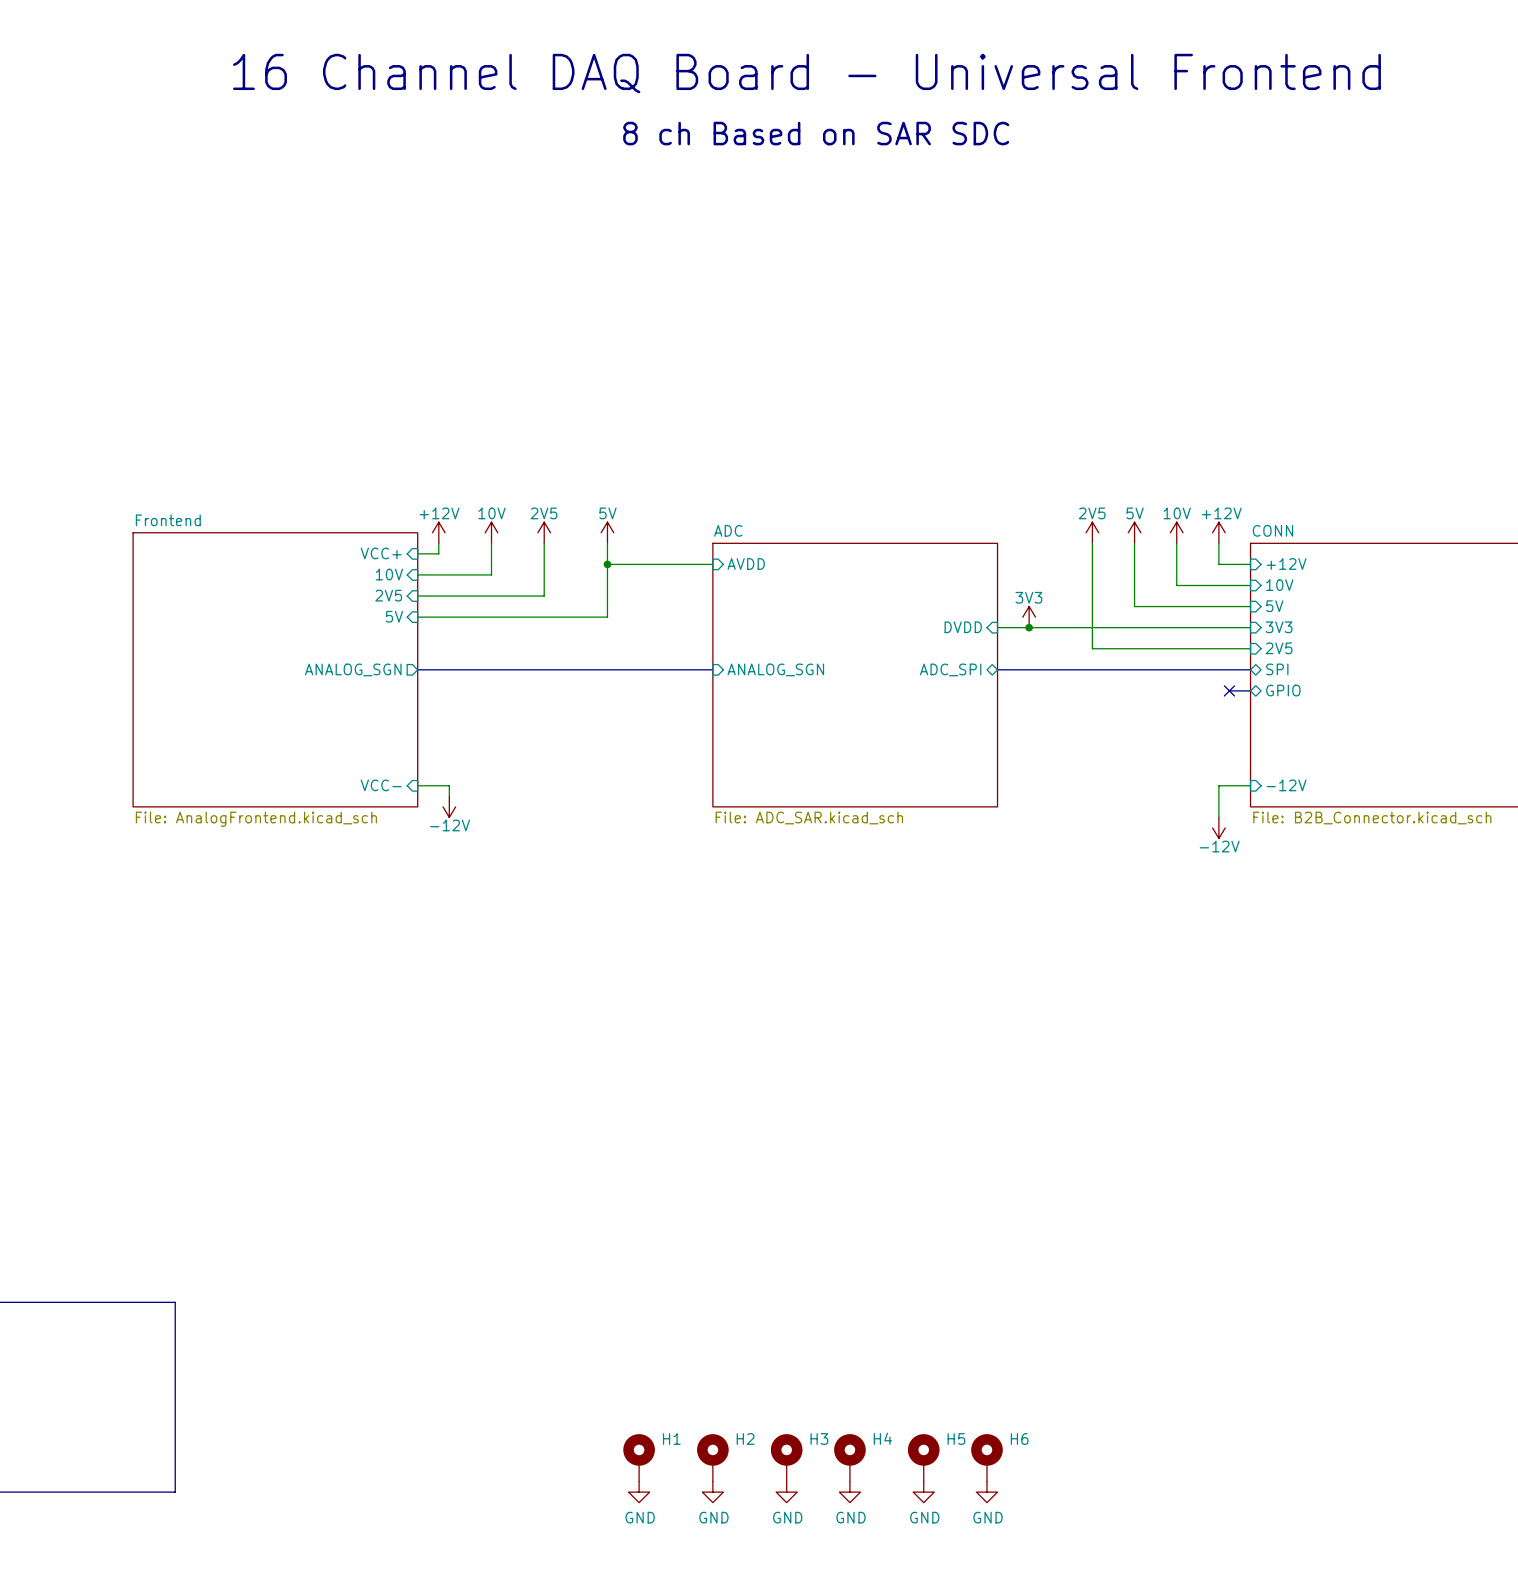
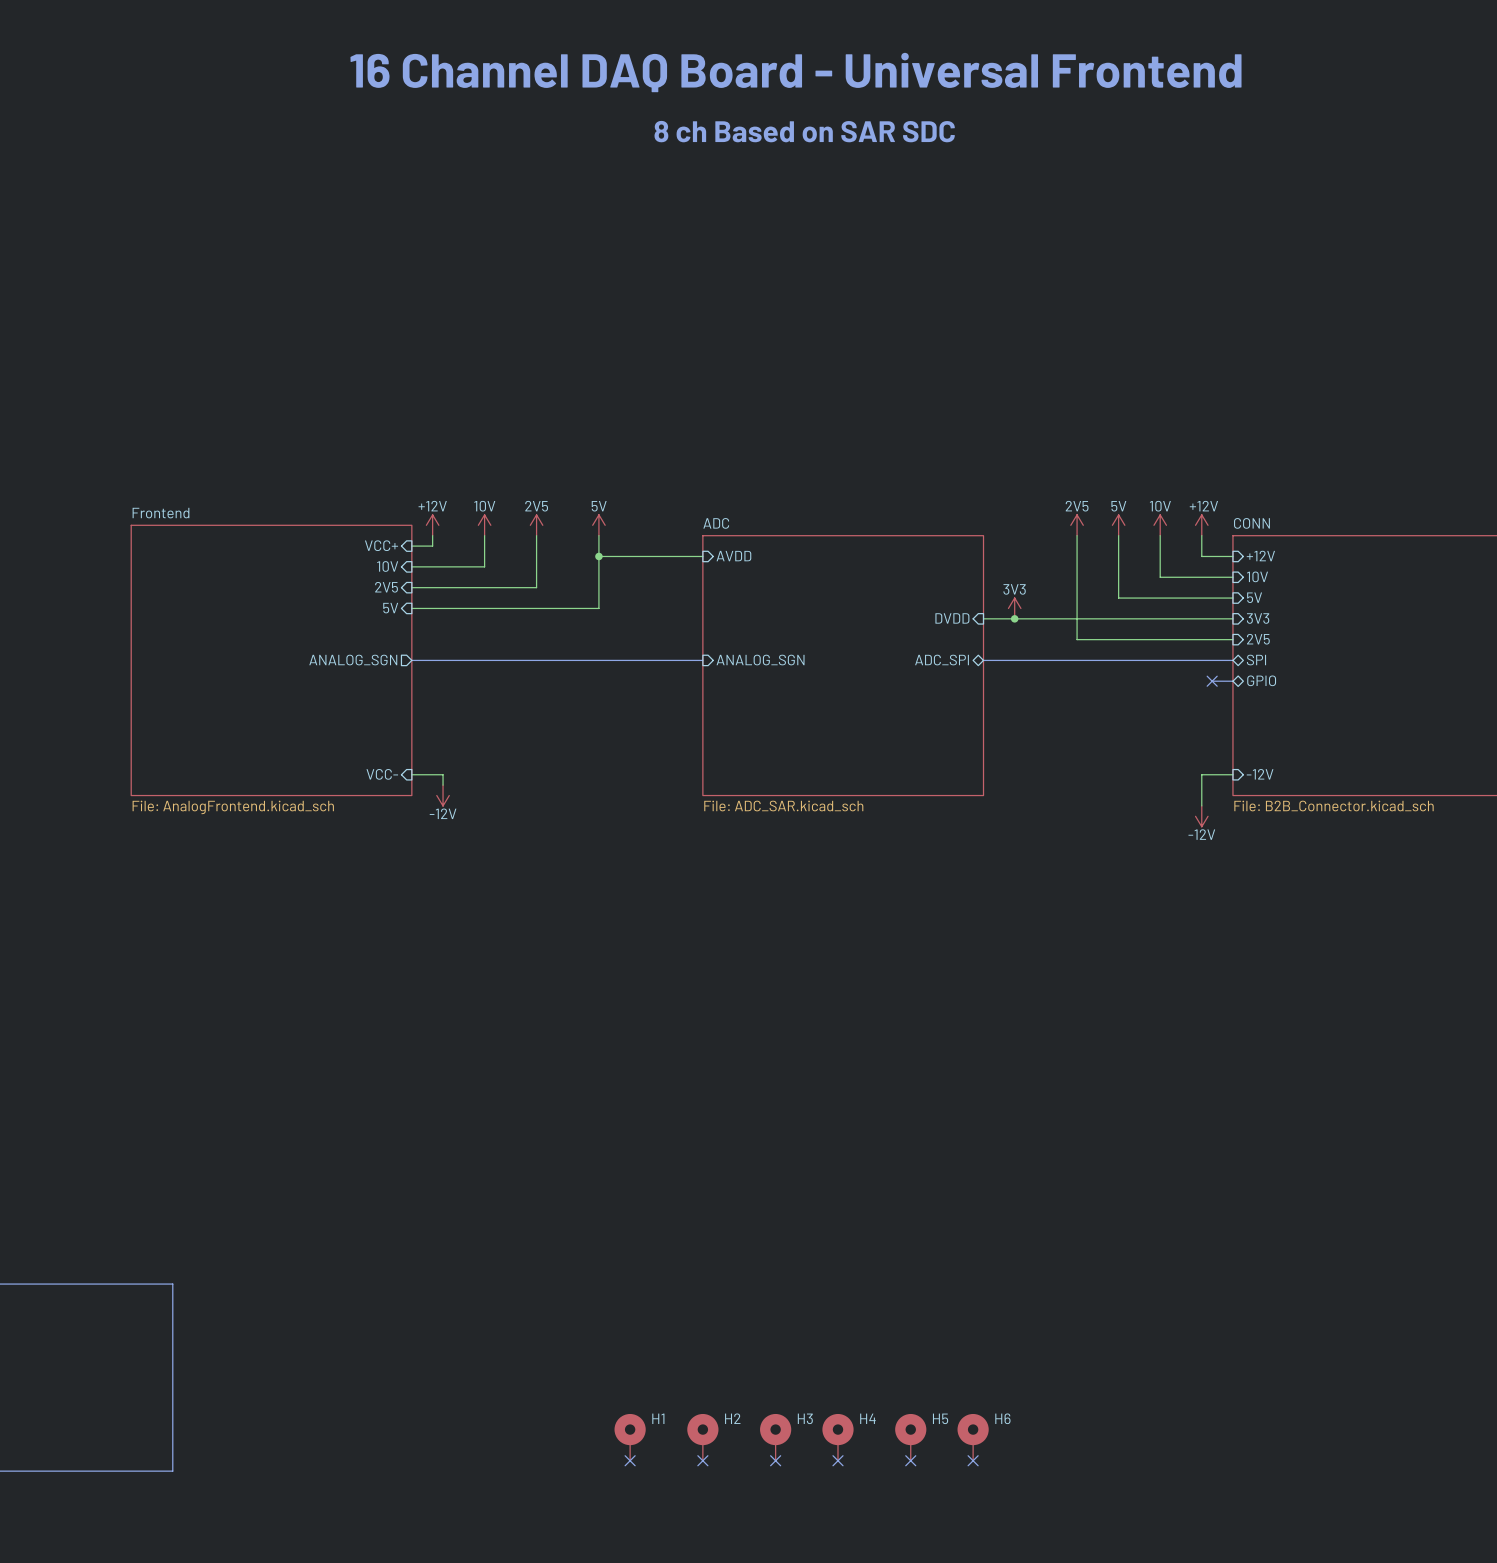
no-connect mark: none -> (630, 1460)
no-connect mark: none -> (702, 1460)
no-connect mark: none -> (775, 1460)
no-connect mark: none -> (837, 1460)
no-connect mark: none -> (910, 1460)
no-connect mark: none -> (973, 1460)
power symbol: GND (639, 1492) -> none
power symbol: GND (712, 1492) -> none
power symbol: GND (786, 1492) -> none
power symbol: GND (849, 1492) -> none
power symbol: GND (923, 1492) -> none
power symbol: GND (986, 1492) -> none

